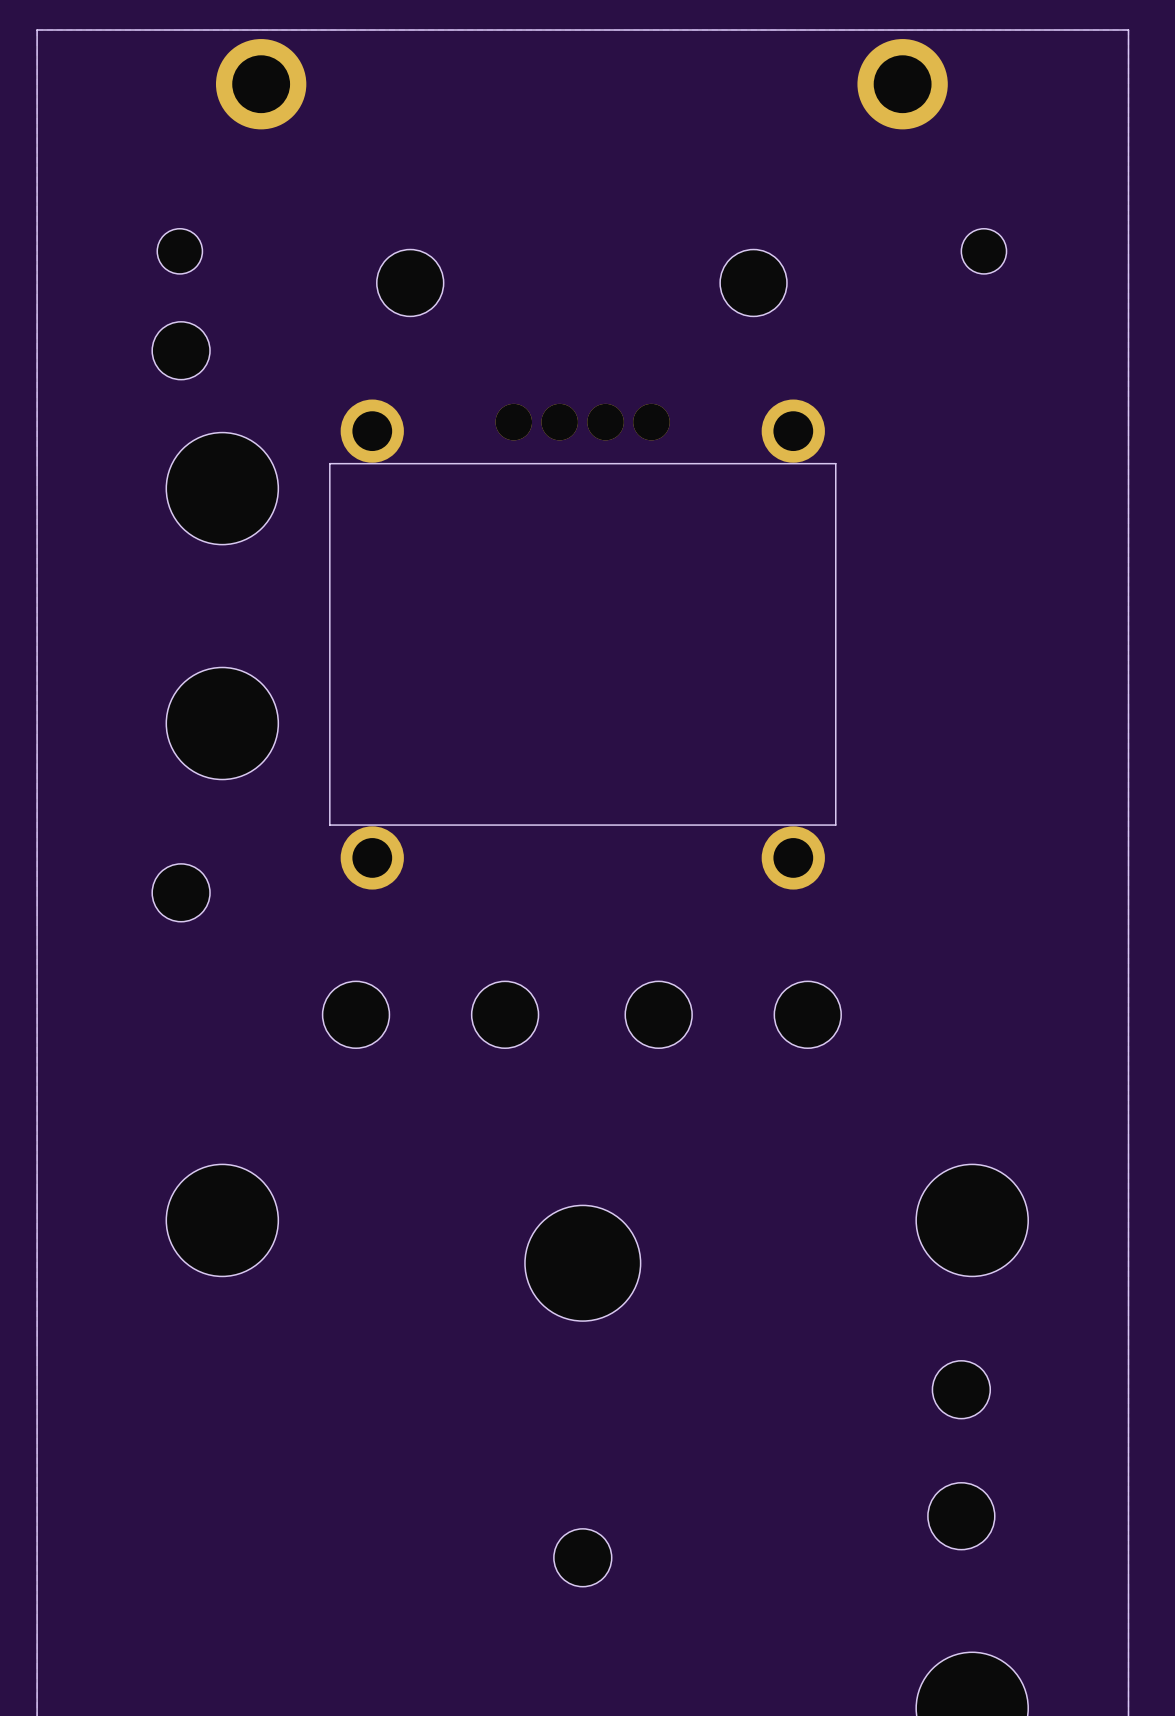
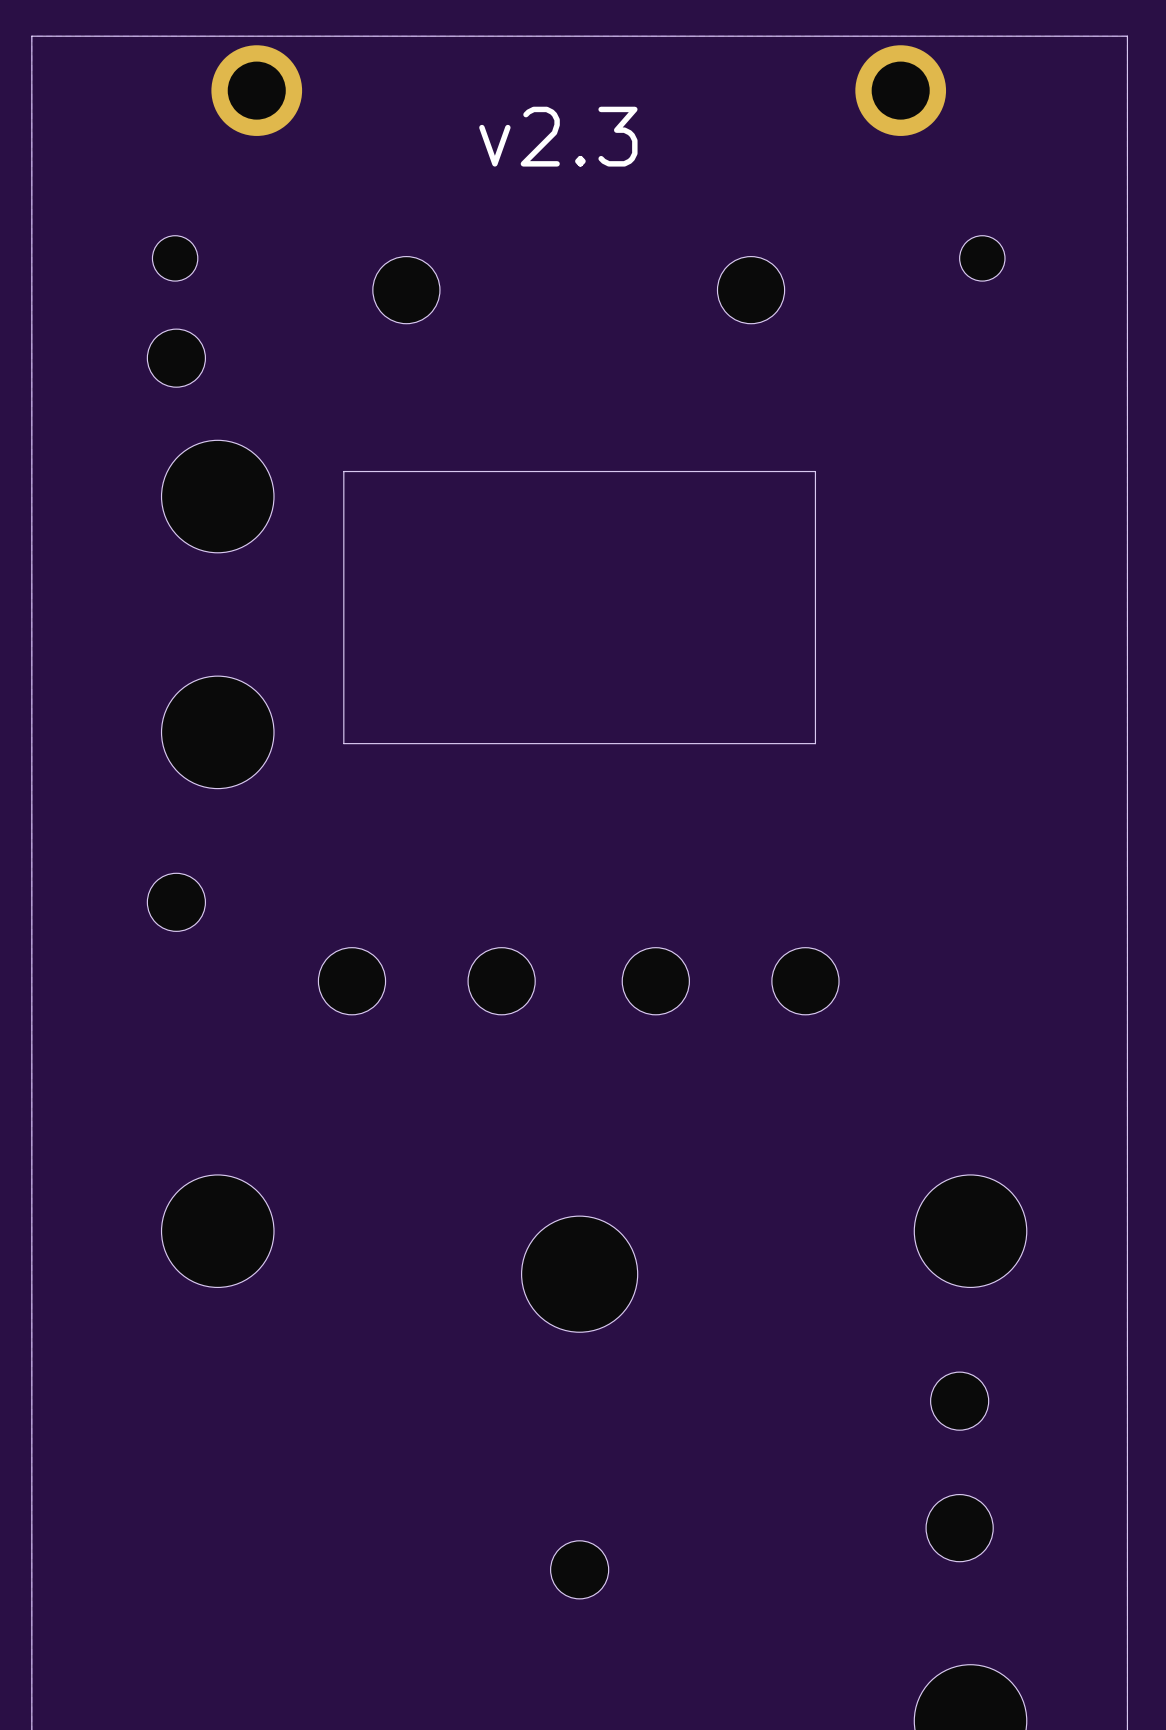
text: none -> v2.3 (558, 136)
part: (582, 422) -> none
part: (372, 431) -> none
part: (793, 431) -> none
board edge: (817, 463) (835, 463) (835, 825) (329, 825) (329, 463) (347, 463) -> (815, 471) (815, 743) (343, 743) (343, 471)
part: (372, 857) -> none
part: (793, 857) -> none
part position: (356, 1014) -> (351, 981)
part position: (505, 1014) -> (501, 981)
part position: (658, 1014) -> (655, 981)
part position: (807, 1014) -> (805, 981)

